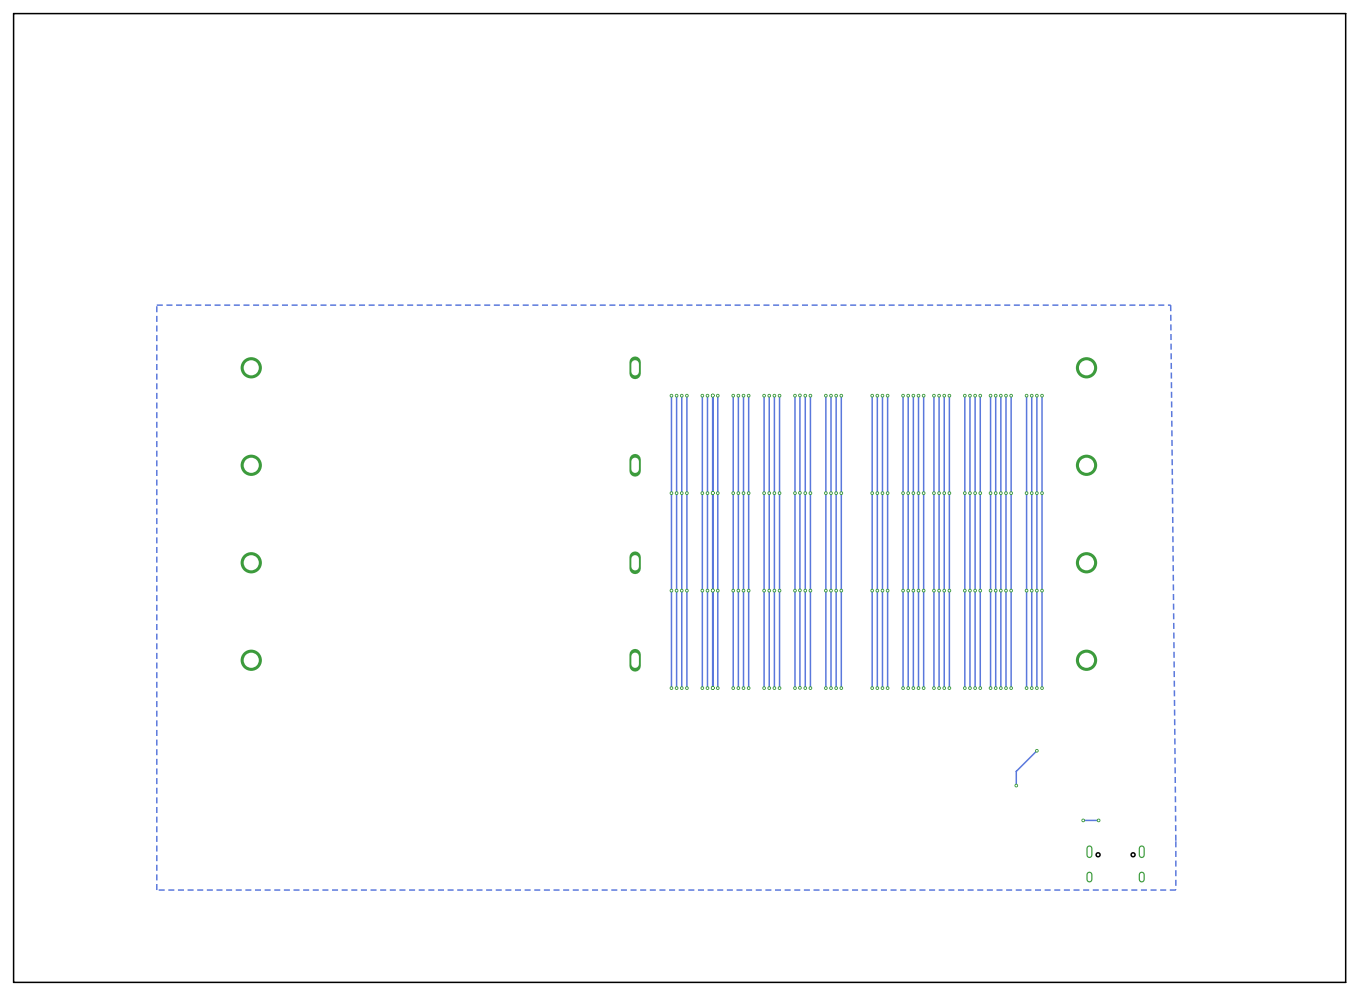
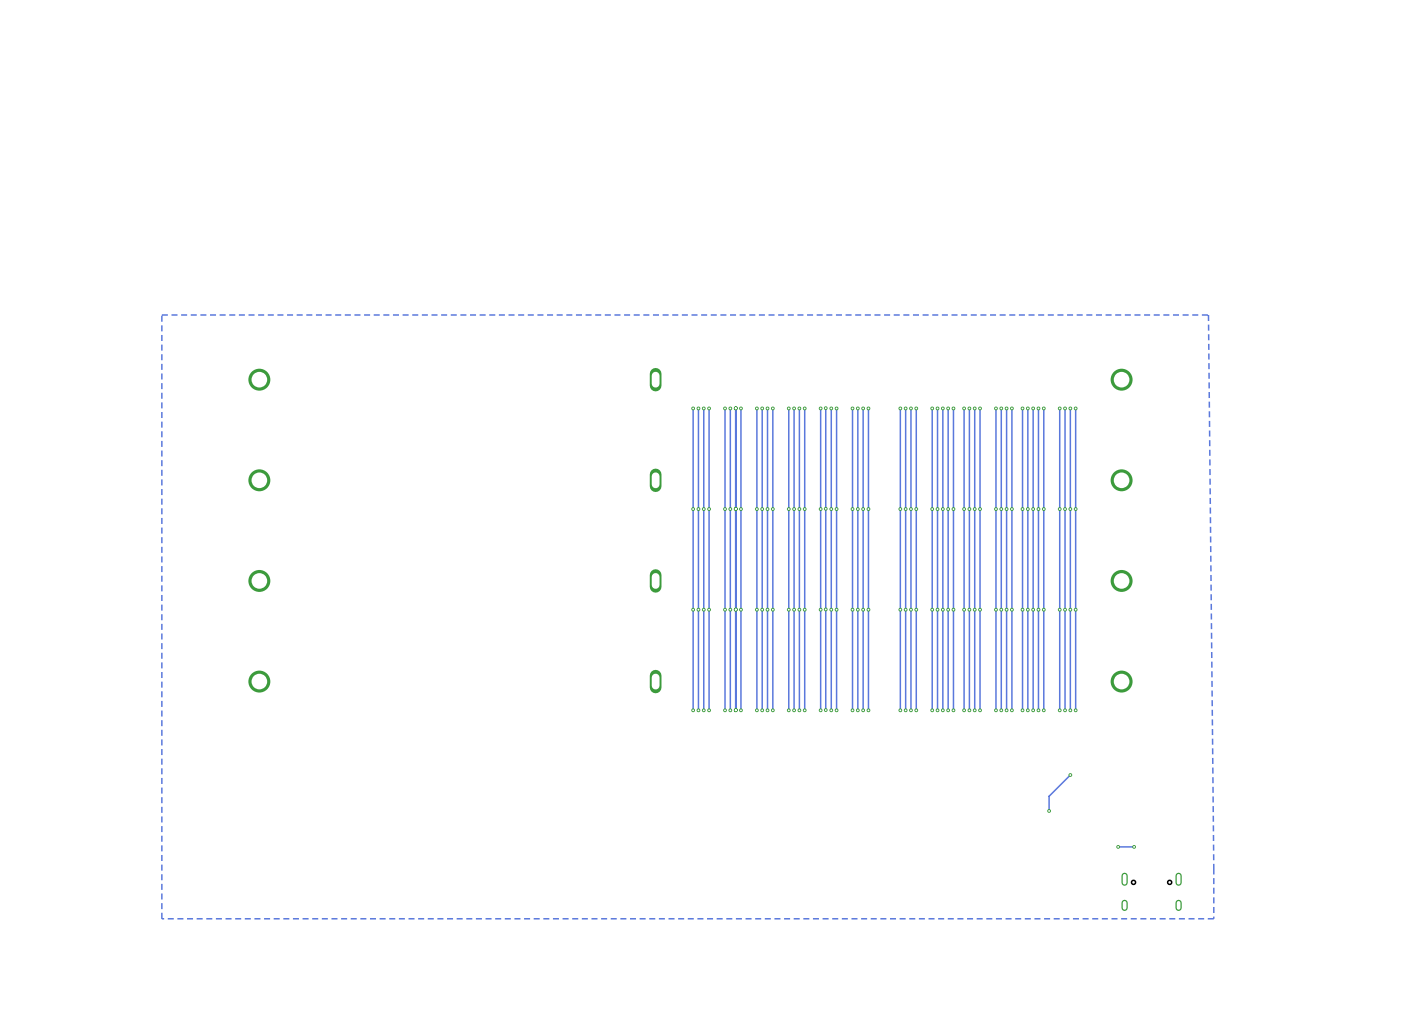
board edge: (1345, 13) (13, 13) (13, 982) (1345, 982) (1345, 13) -> none

